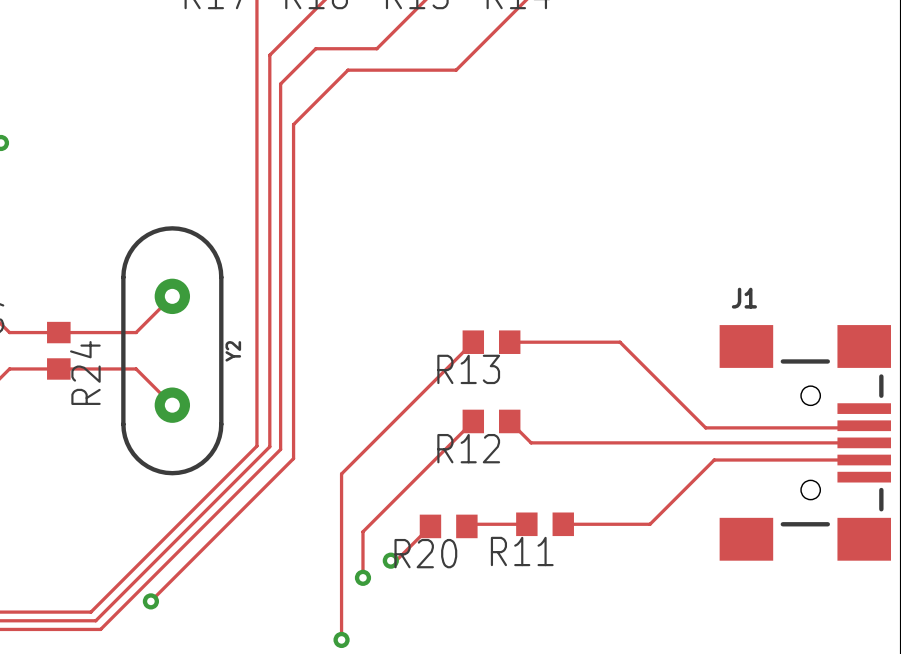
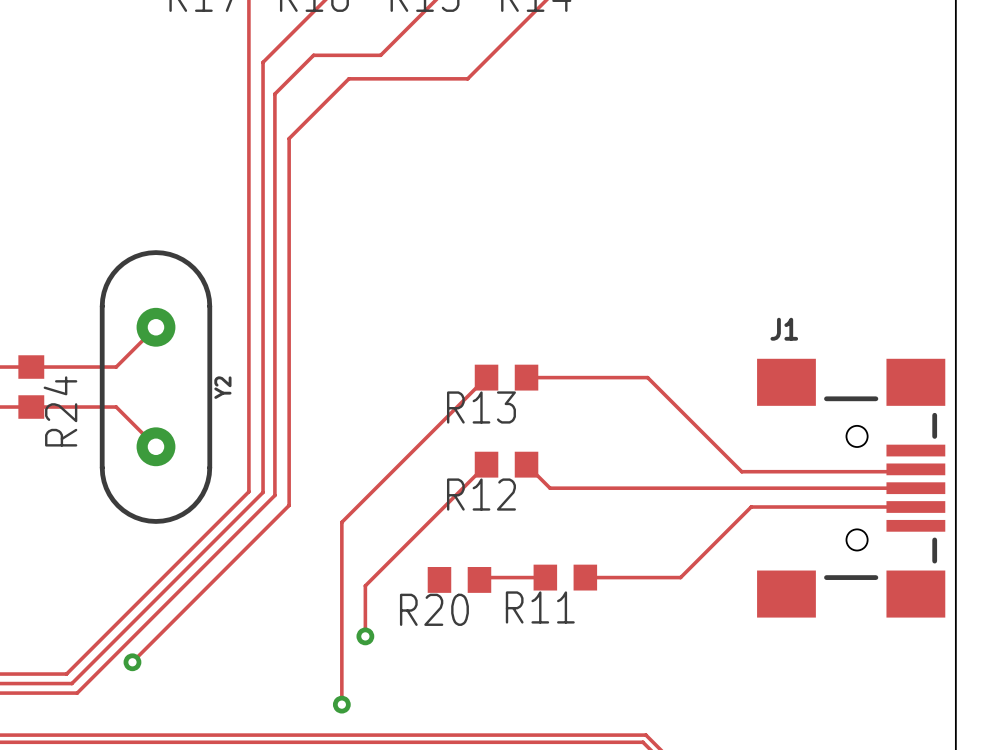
track: (430, 526) (396, 560) (390, 560) -> none
via: (390, 560) -> none

